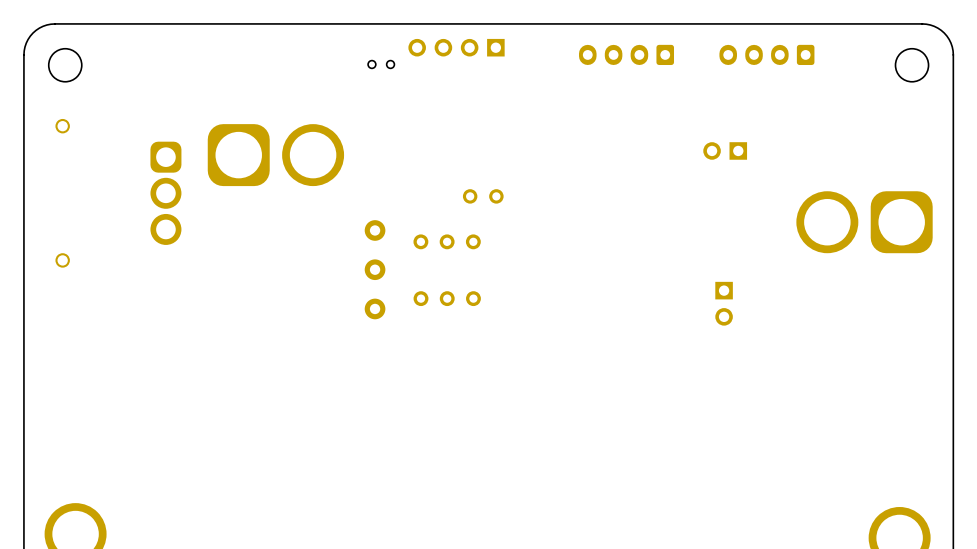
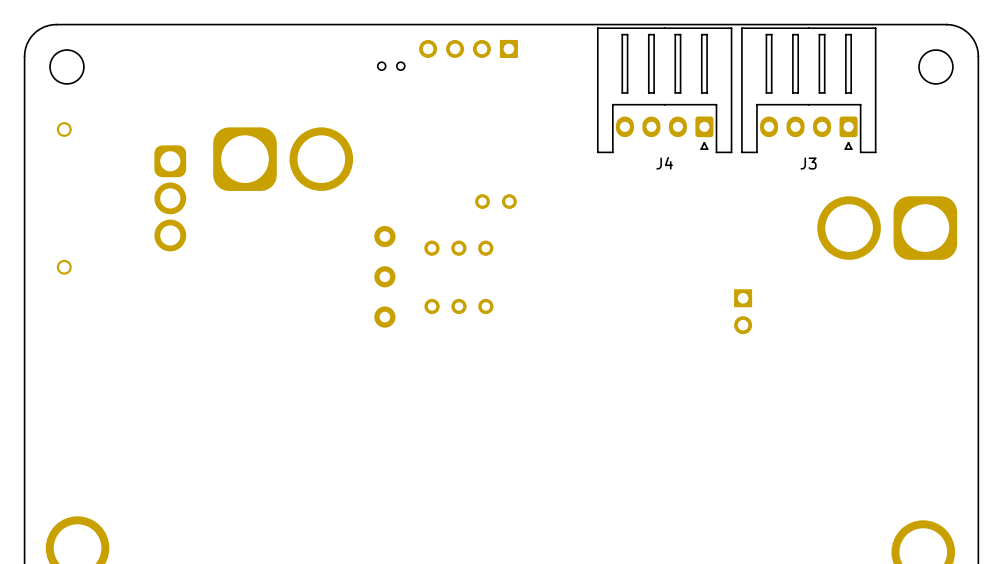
J4 side: top (626, 54) -> bottom (664, 90)
J3 side: top (766, 54) -> bottom (808, 90)
part: (725, 150) -> none

